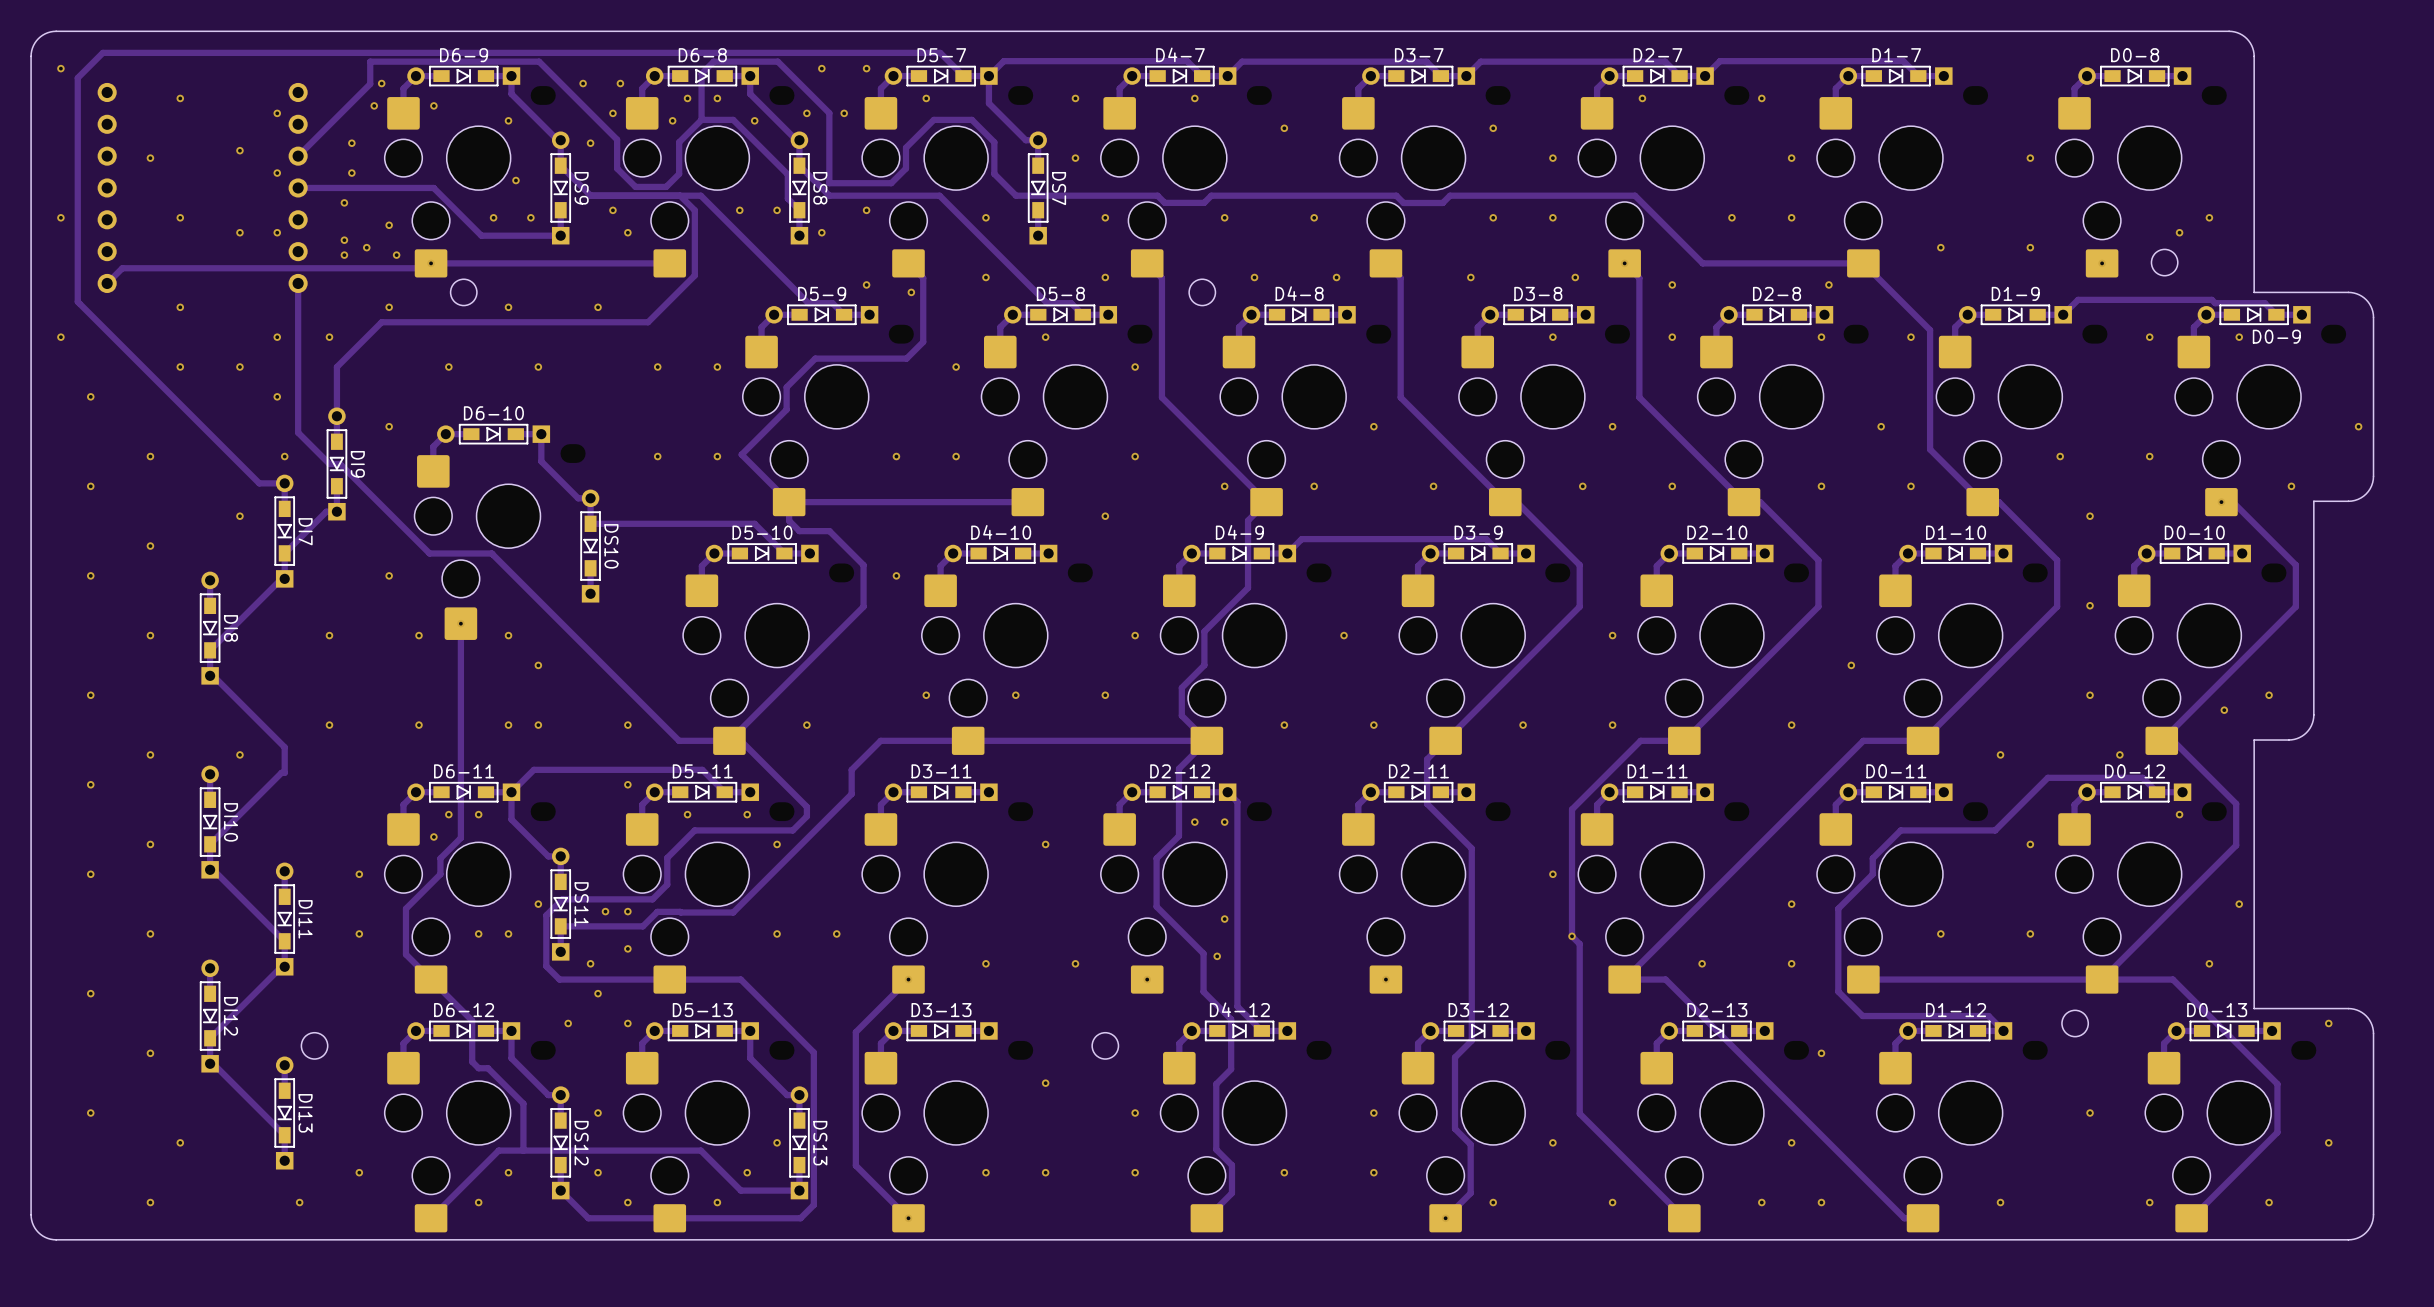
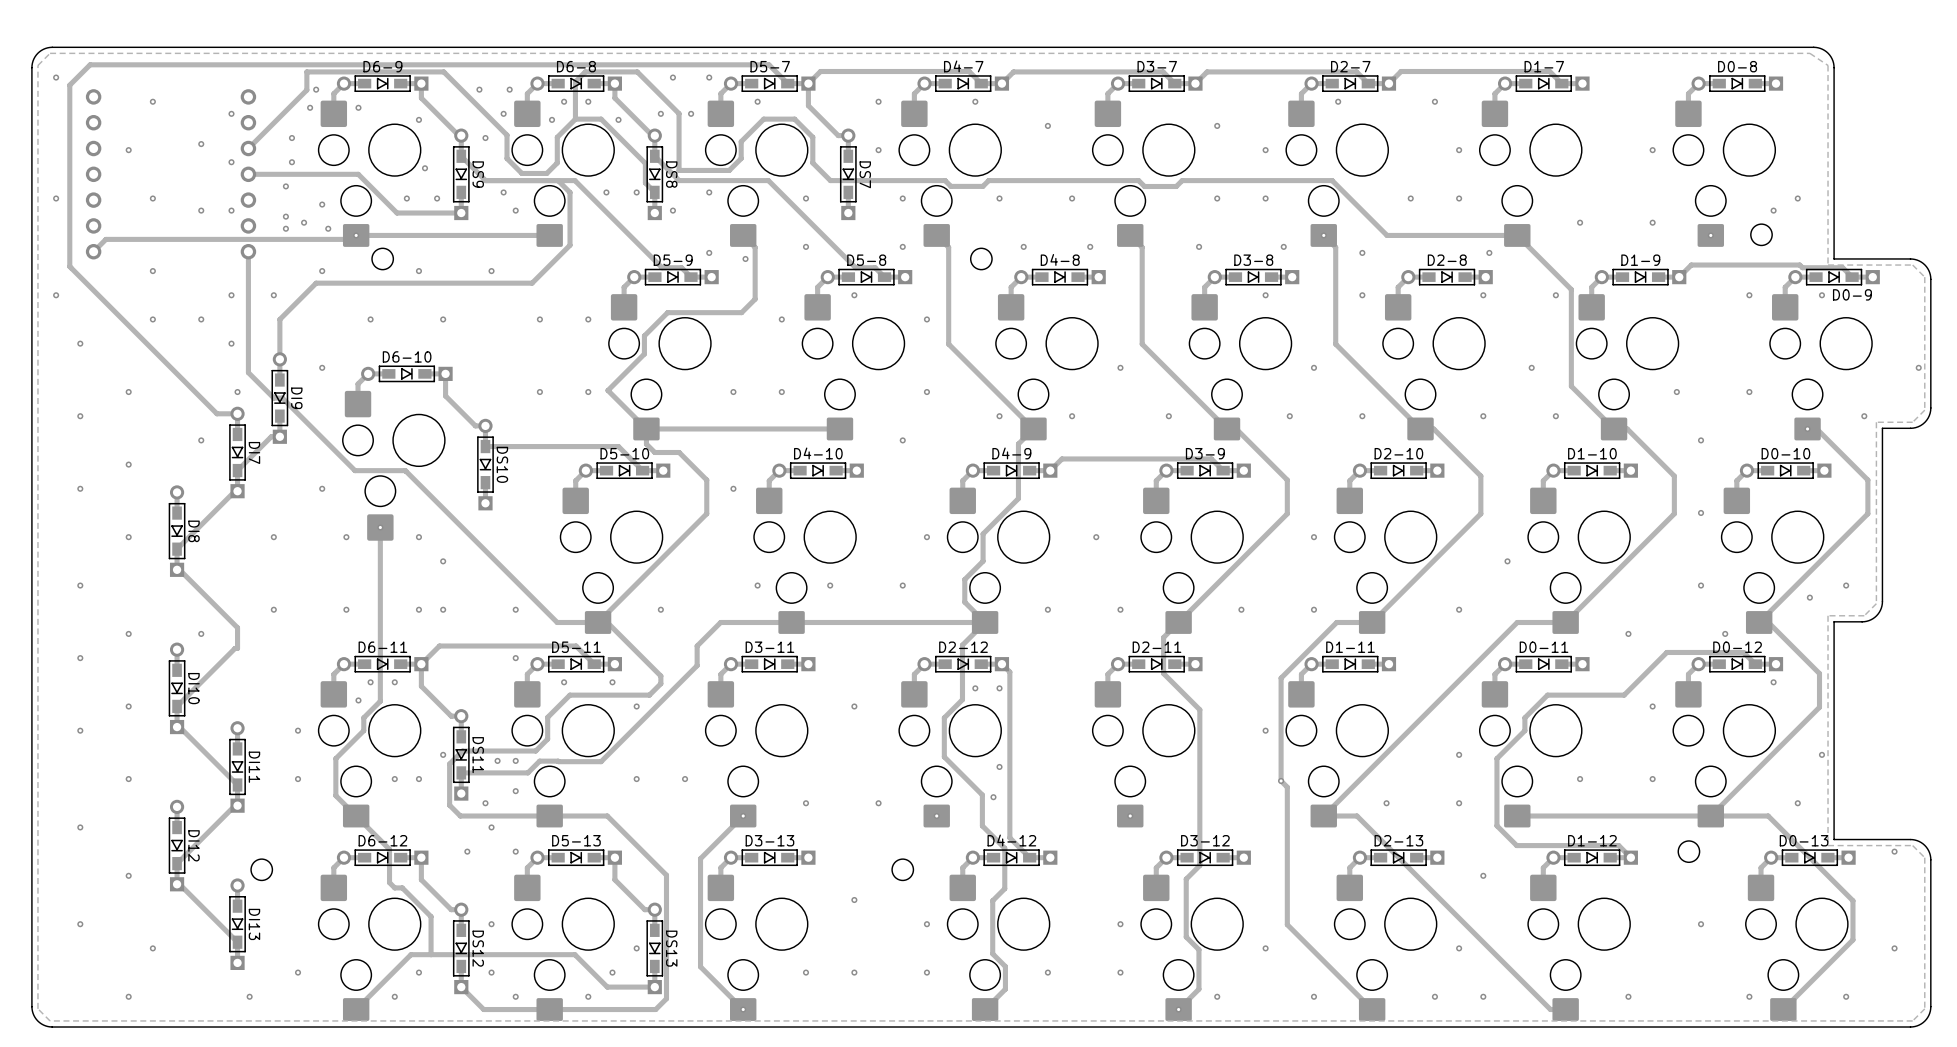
zone outline: none -> (1809, 53) (50, 53) (37, 65) (37, 1008) (50, 1020) (1912, 1020) (1924, 1008) (1924, 857) (1912, 845) (1828, 845) (1828, 615) (1864, 615) (1876, 603) (1876, 422) (1912, 422) (1924, 410) (1924, 277) (1912, 265) (1828, 265) (1828, 65) (1809, 53)

